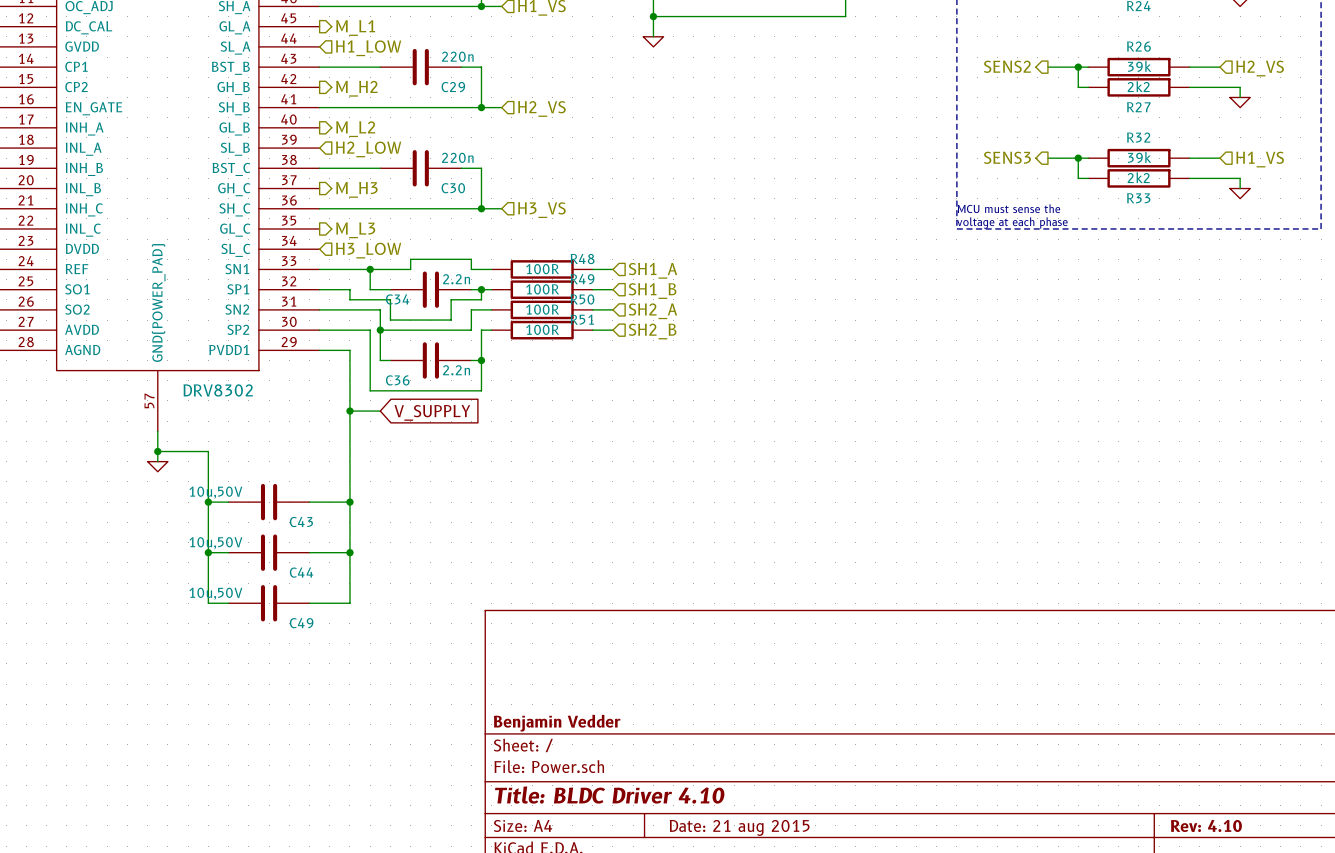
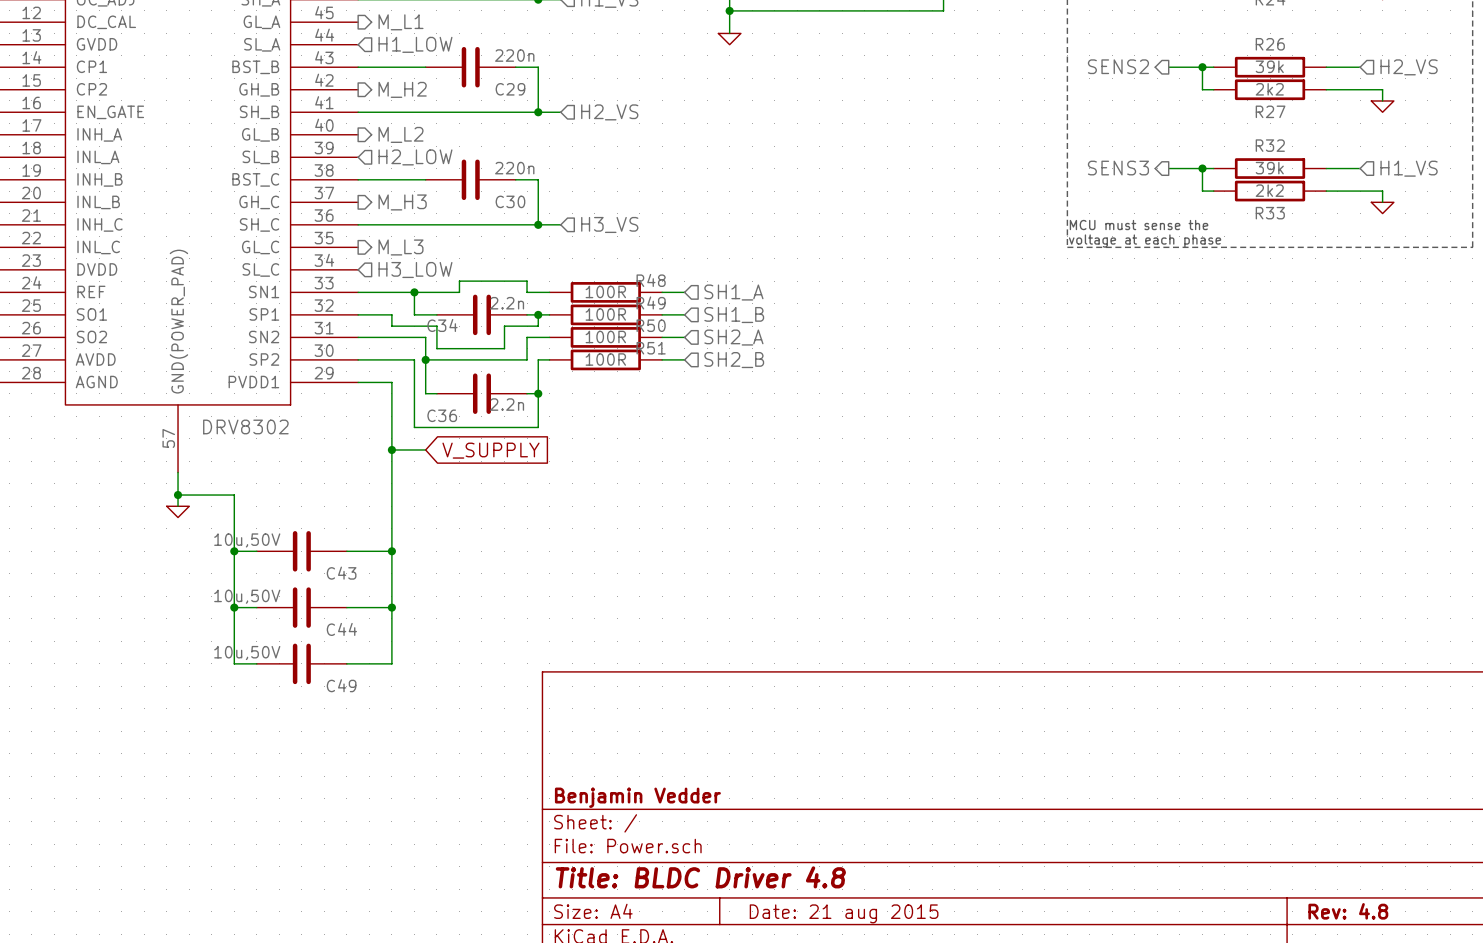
title block: Title: BLDC Driver 4.10 (609, 795) -> Title: BLDC Driver 4.8 (700, 877)
title block: Rev: 4.10 (1206, 825) -> Rev: 4.8 (1348, 911)

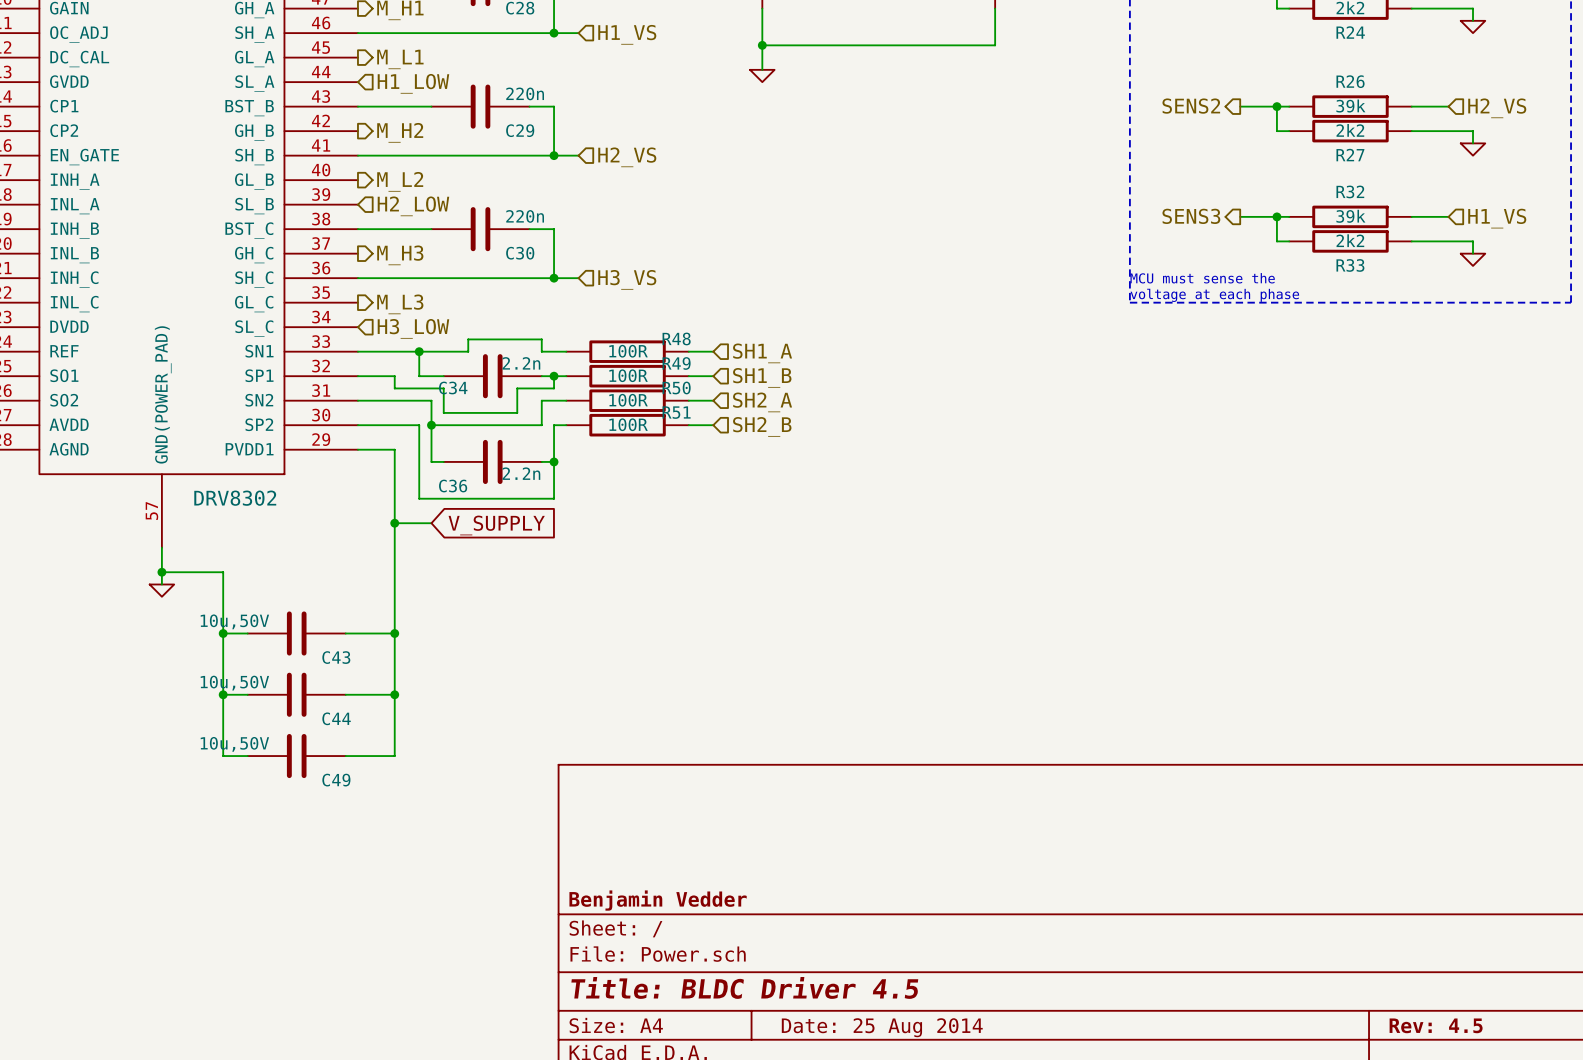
title block: Title: BLDC Driver 4.8 (700, 877) -> Title: BLDC Driver 4.5 (744, 987)
title block: Rev: 4.8 (1348, 911) -> Rev: 4.5 (1436, 1025)
title block: Date: 21 aug 2015 (844, 913) -> Date: 25 Aug 2014 (882, 1027)

